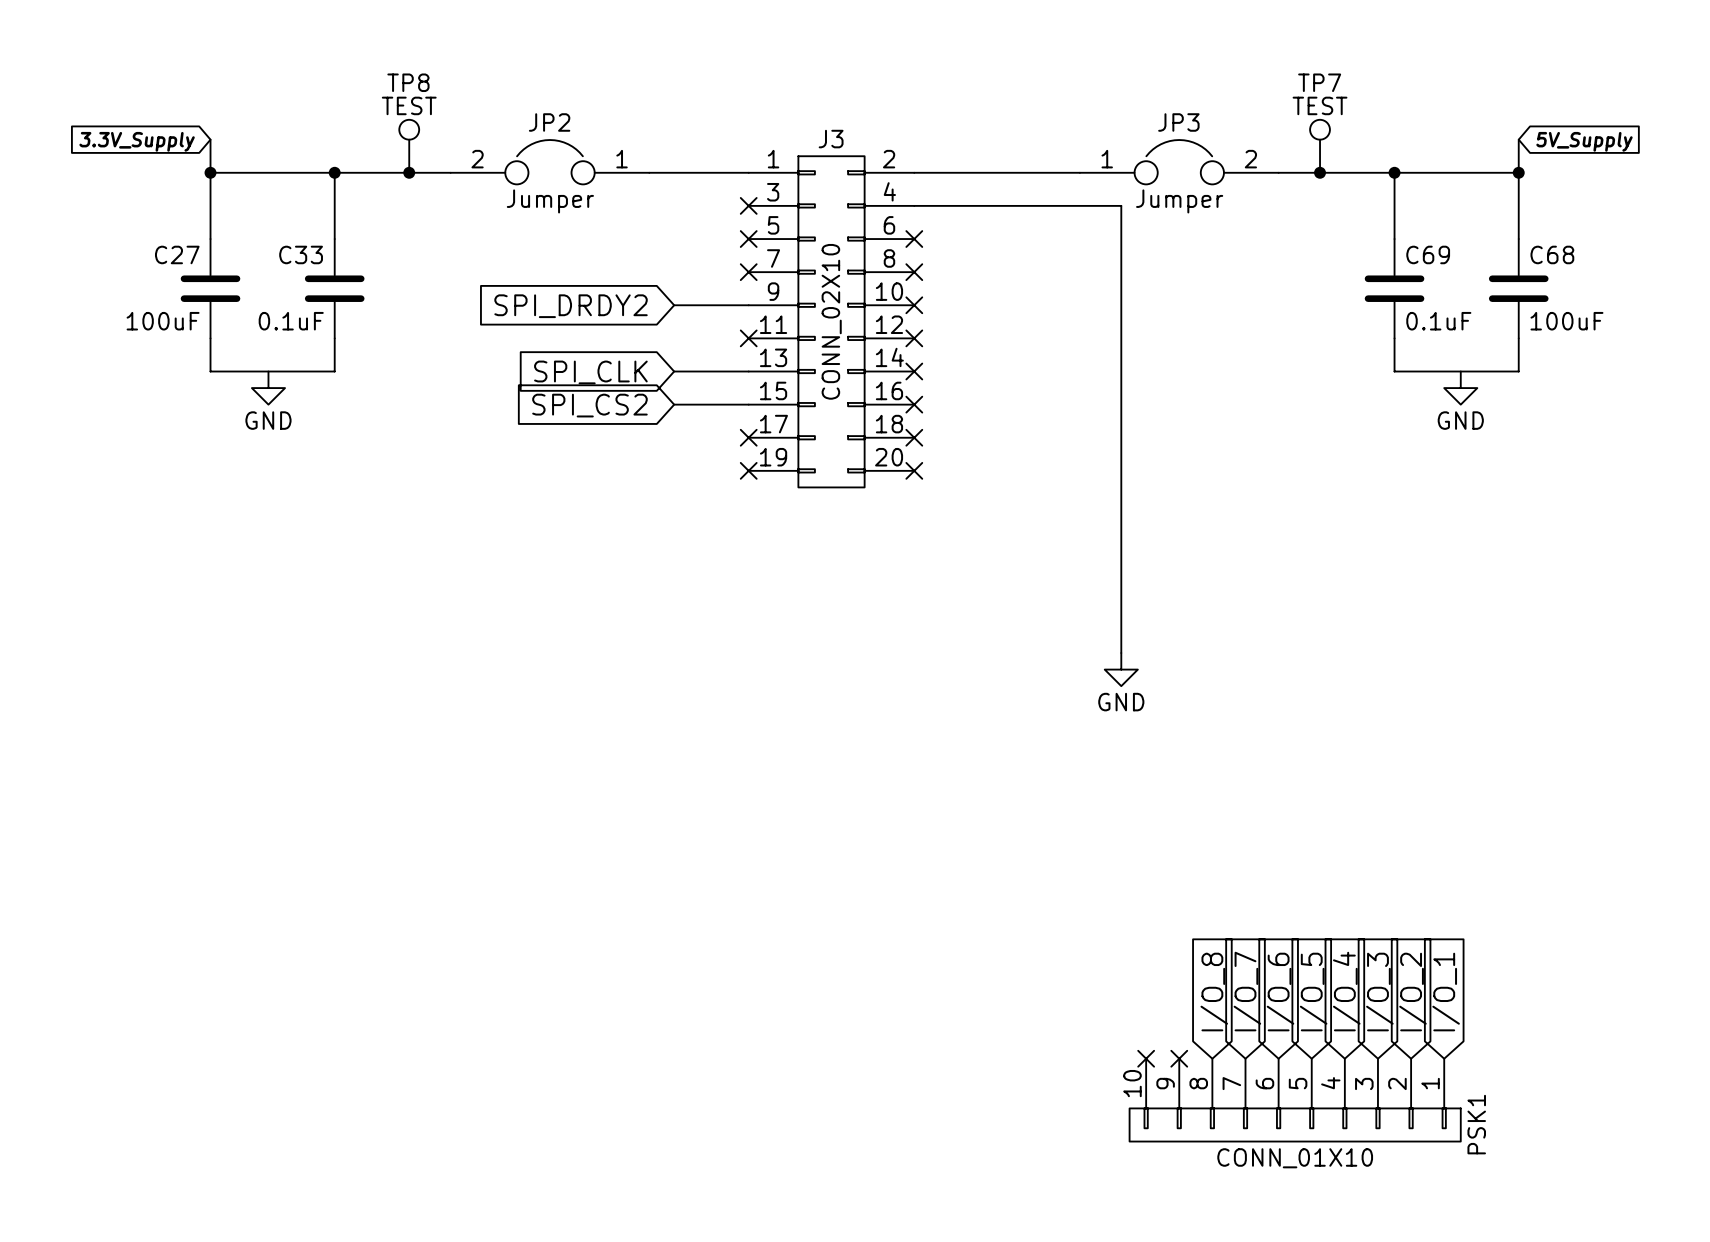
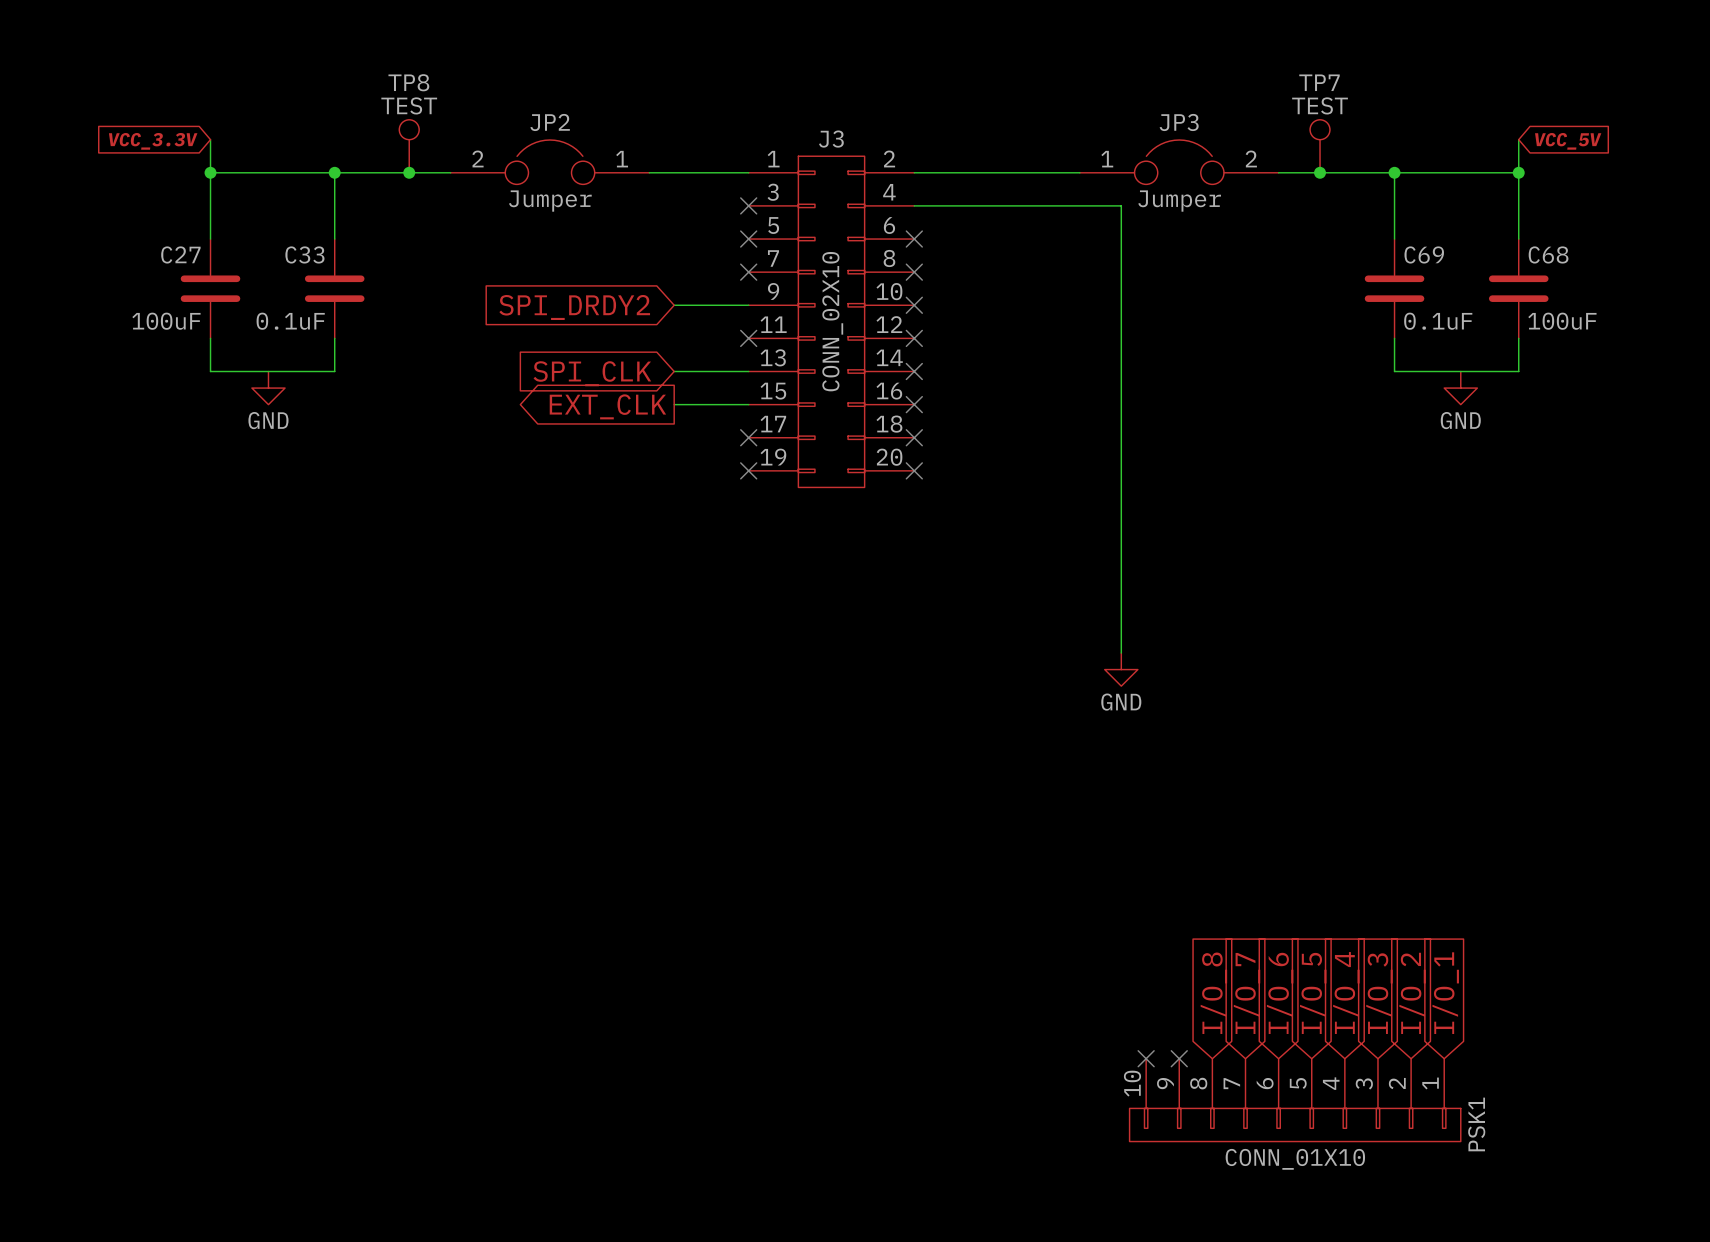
global label: 3.3V_Supply (137, 141) -> VCC_3.3V (153, 141)
global label: 5V_Supply (1584, 141) -> VCC_5V (1568, 141)
global label shape: input (589, 405) -> output (607, 406)
global label: SPI_CS2 (589, 405) -> EXT_CLK (607, 406)

